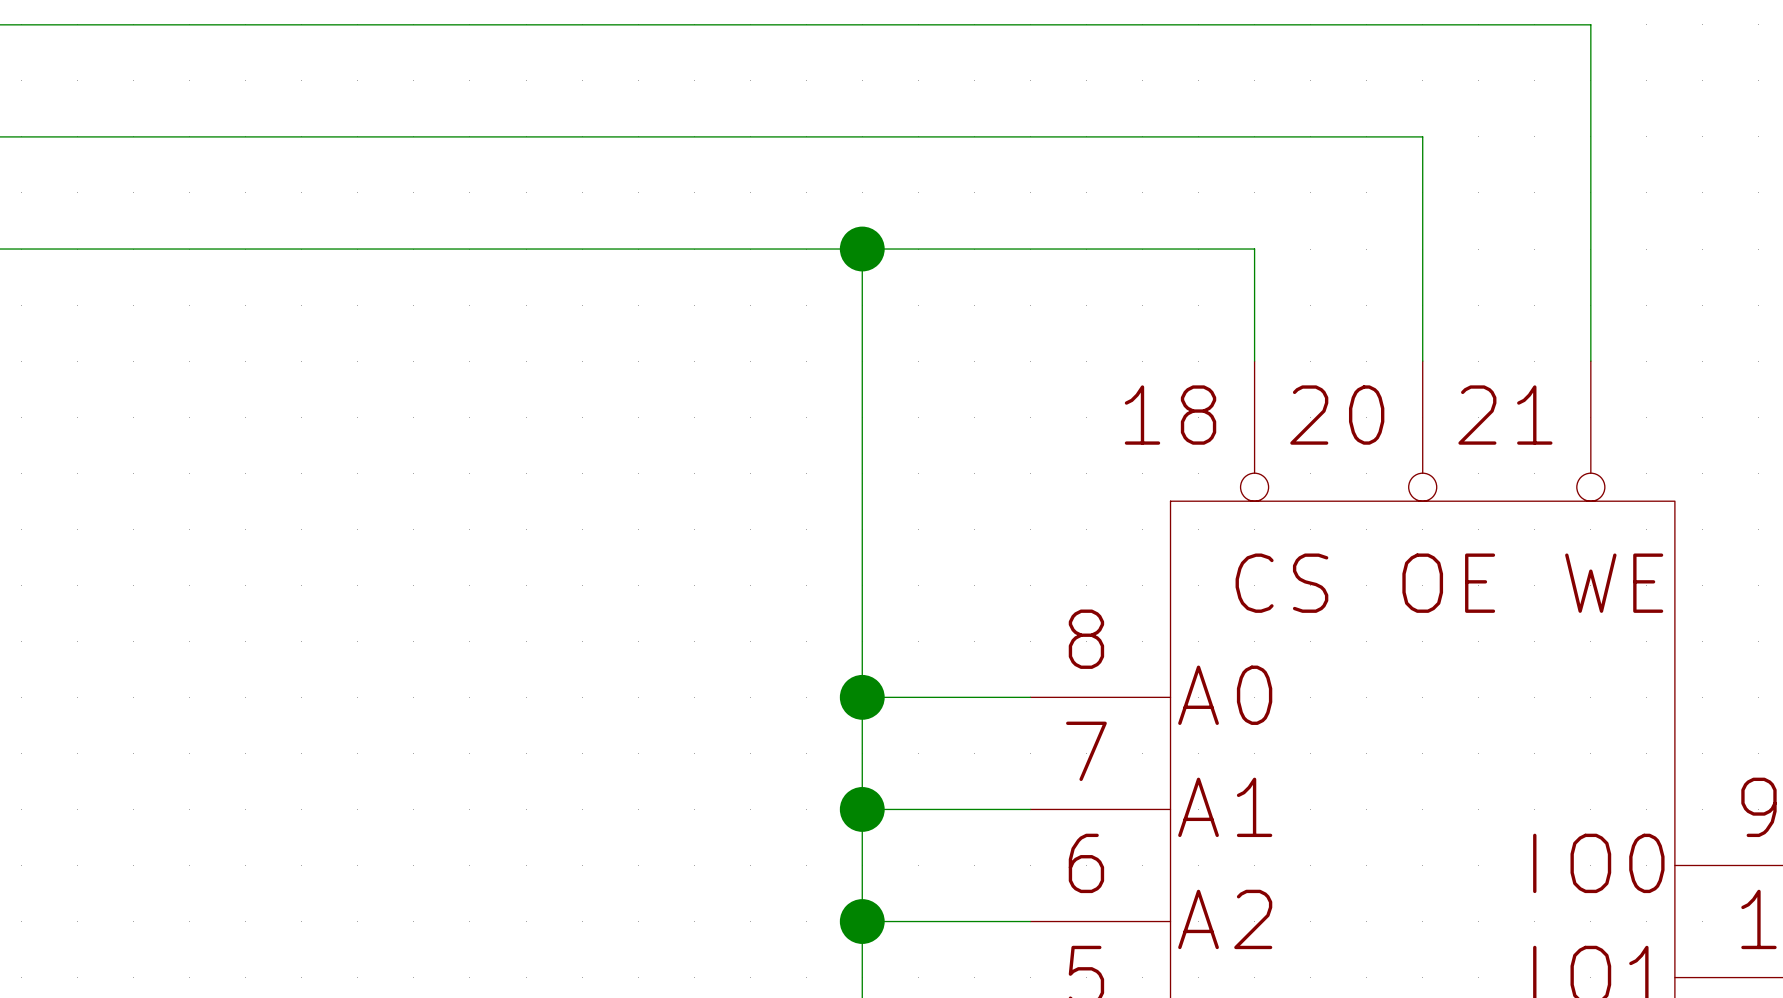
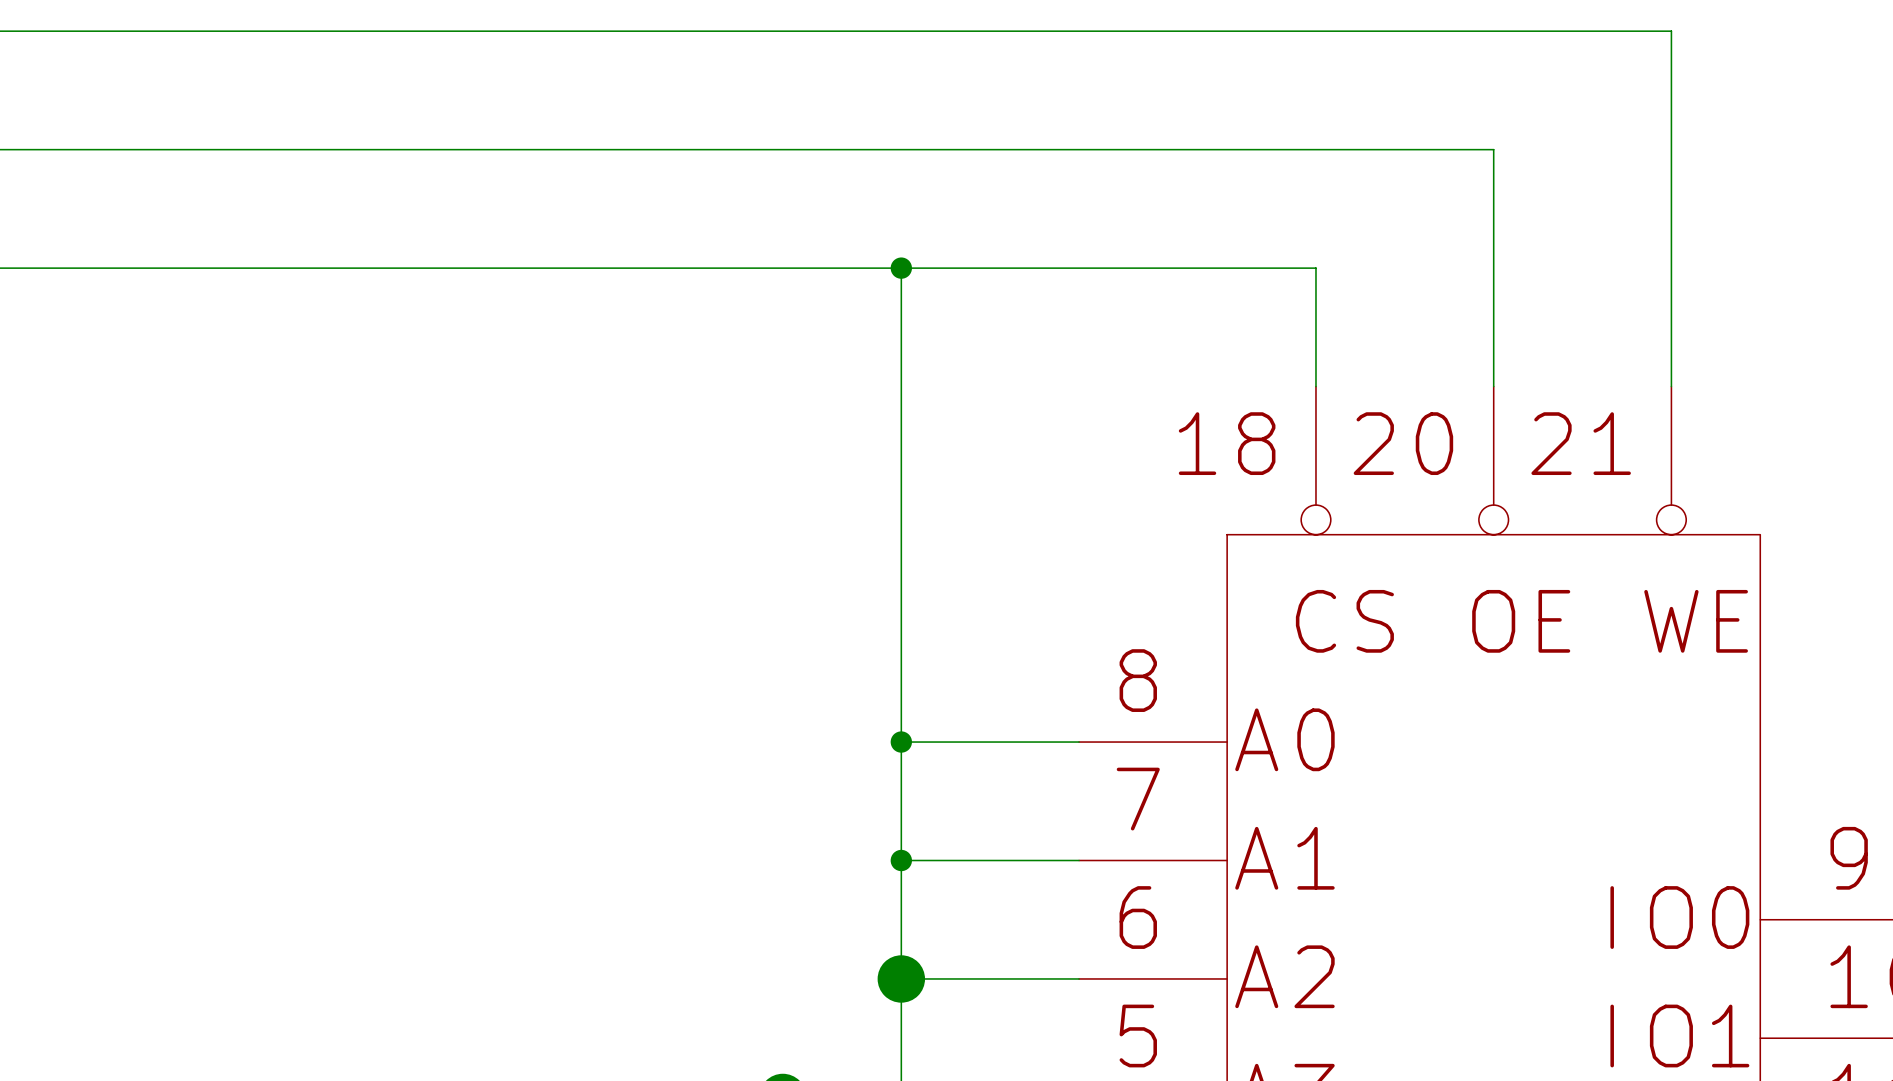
junction size: [839, 226, 885, 272] -> [890, 257, 912, 279]
junction size: [839, 674, 885, 720] -> [890, 731, 912, 753]
junction size: [839, 787, 885, 832] -> [890, 849, 912, 872]

